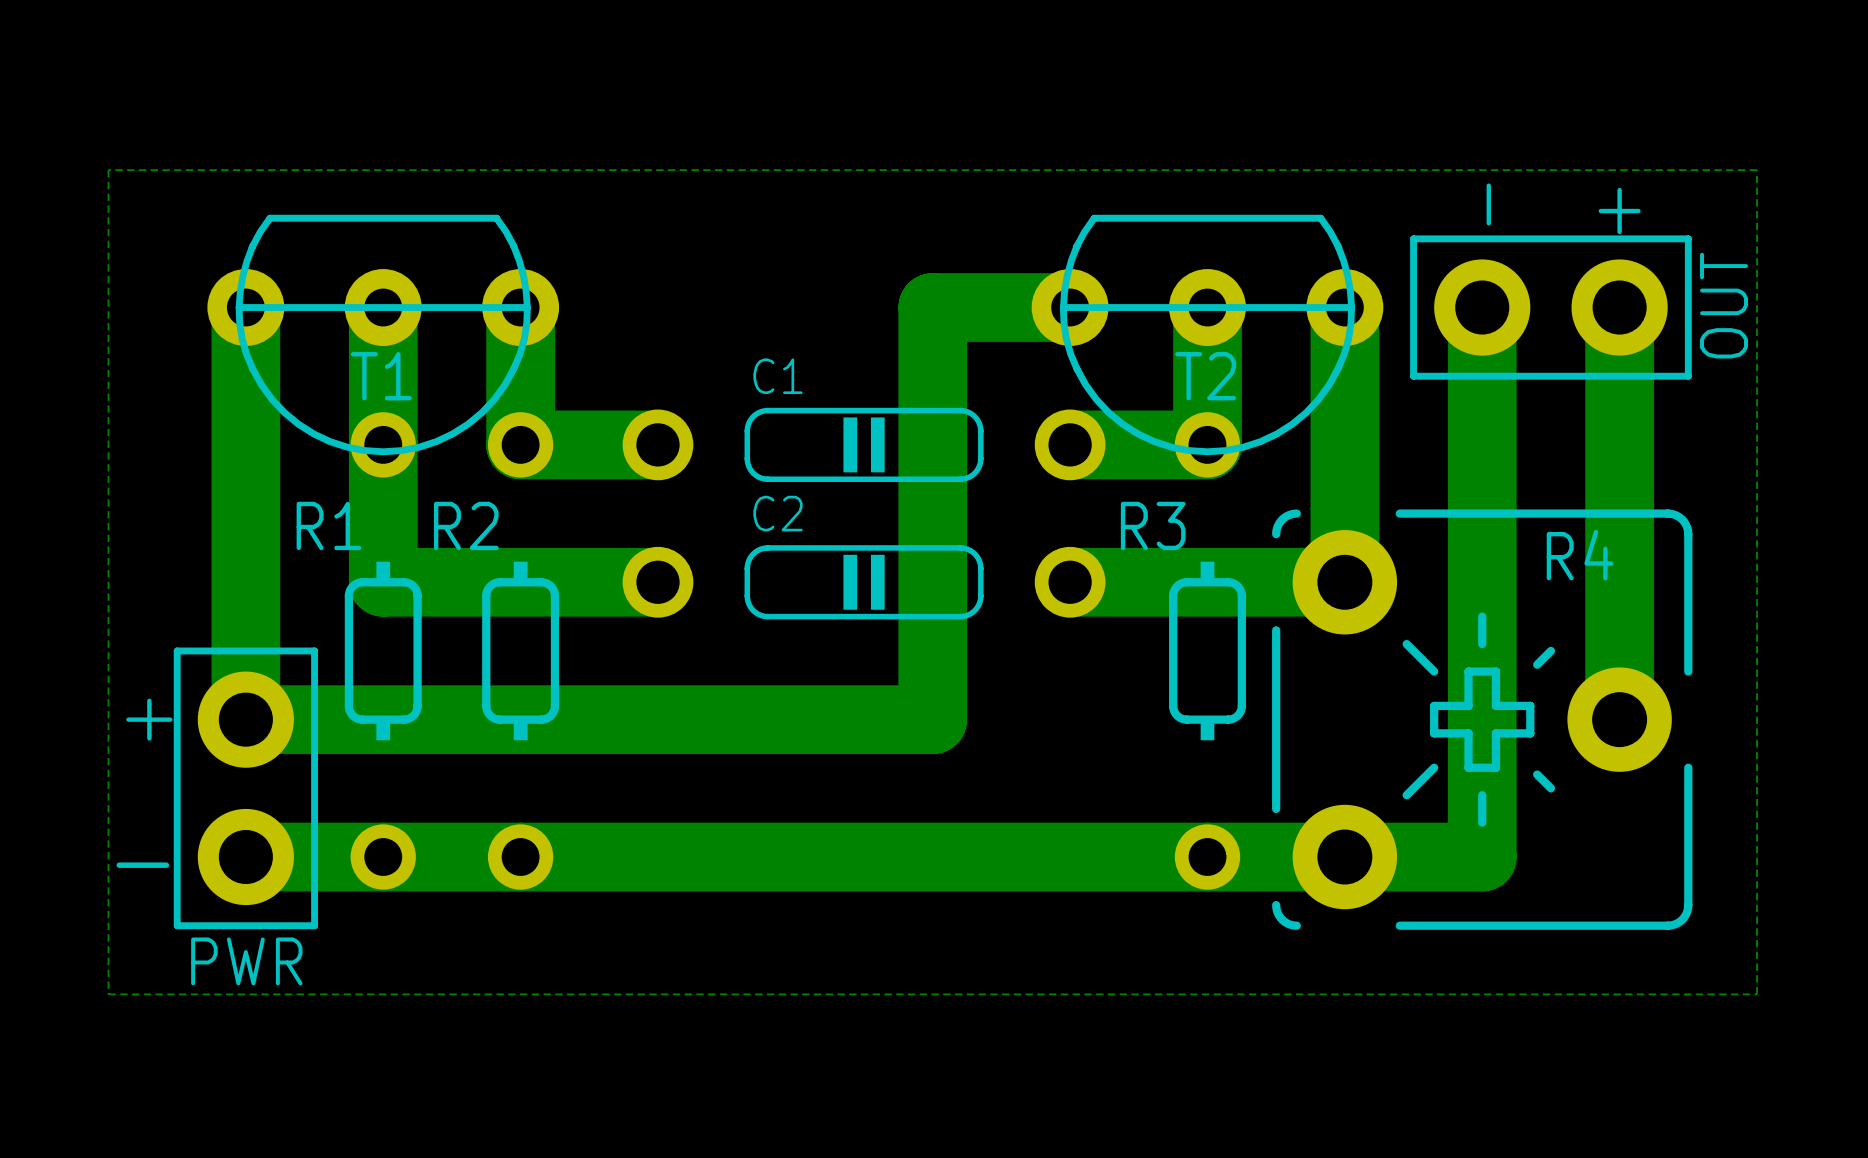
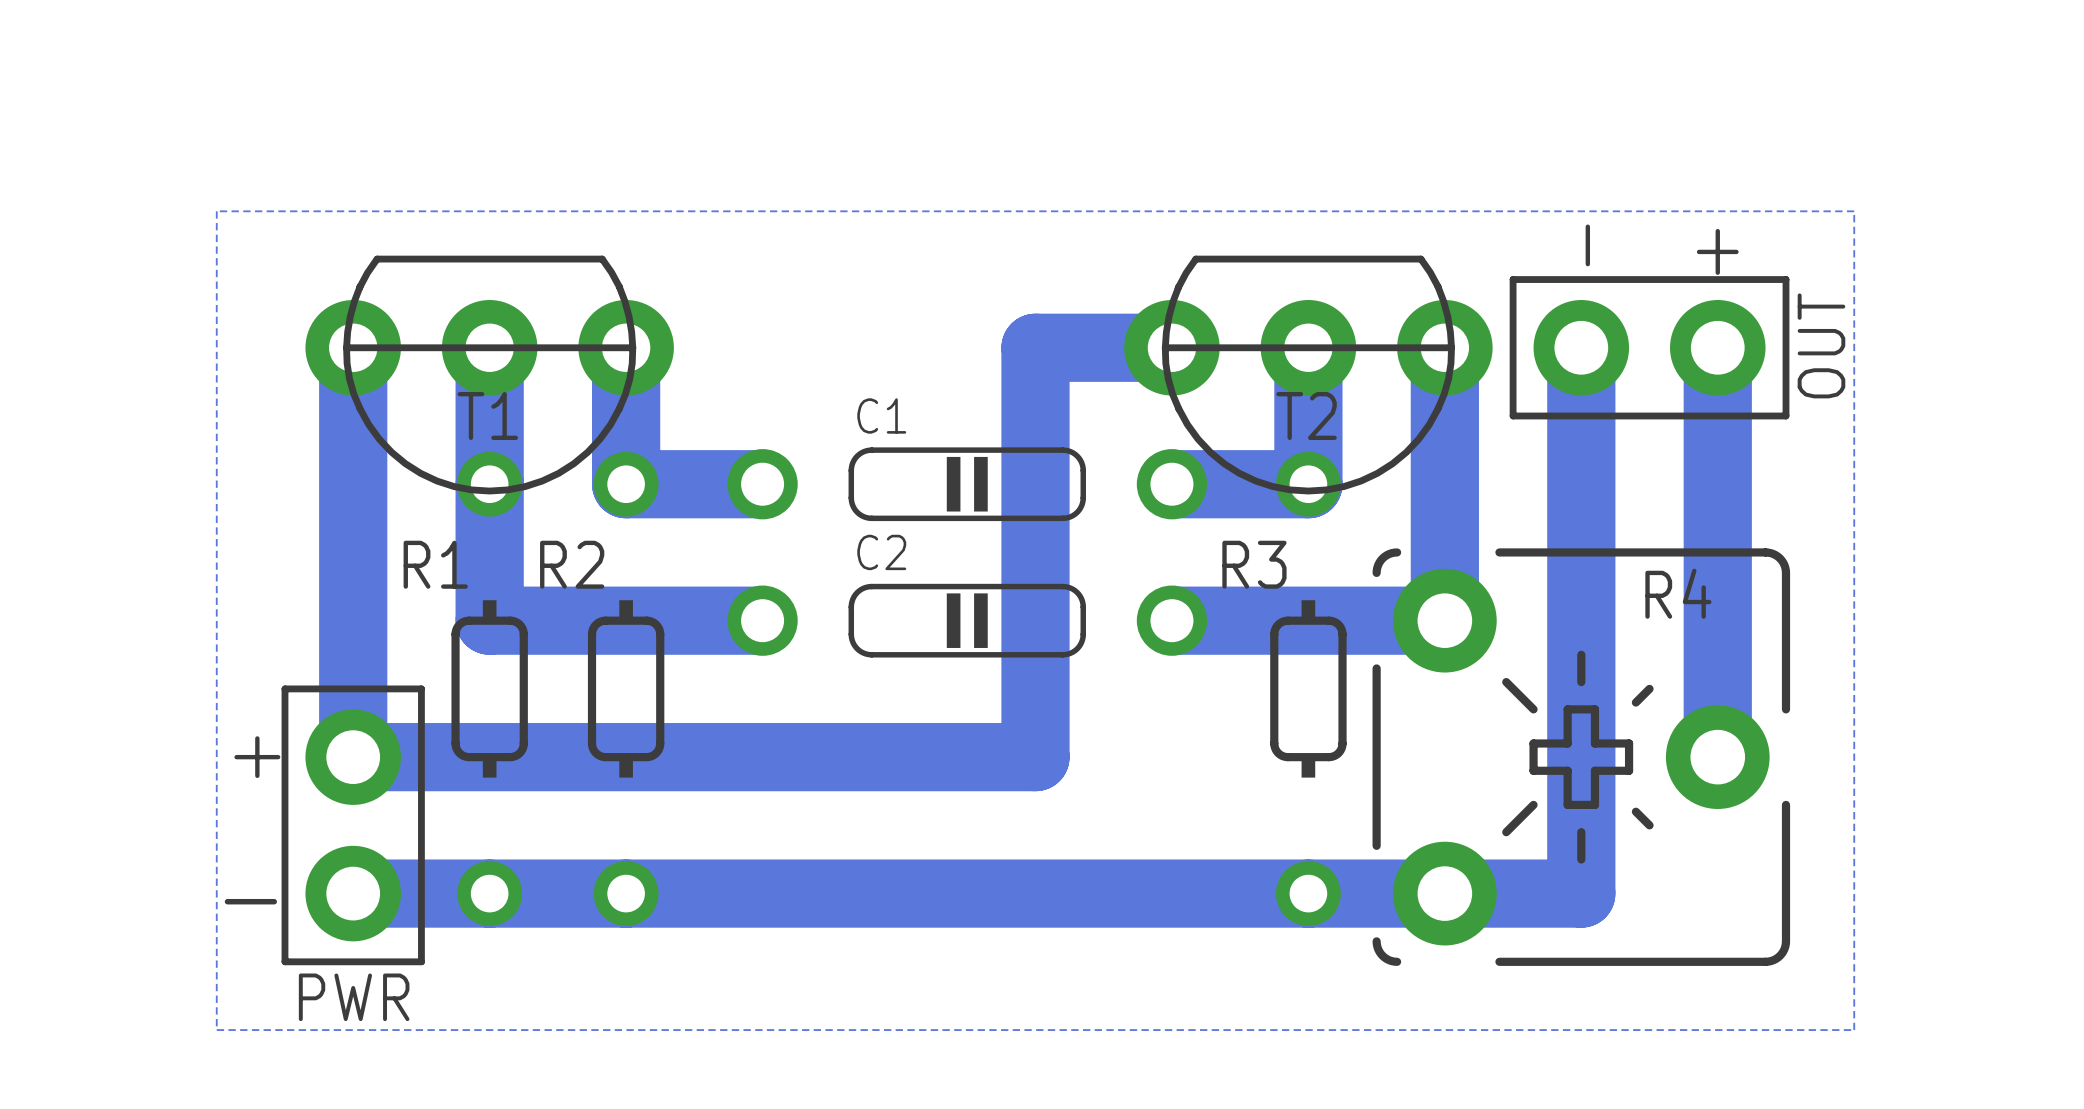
T1 footprint: [207, 214, 560, 456] -> [305, 255, 674, 495]
T2 footprint: [1031, 214, 1384, 456] -> [1124, 255, 1493, 495]

